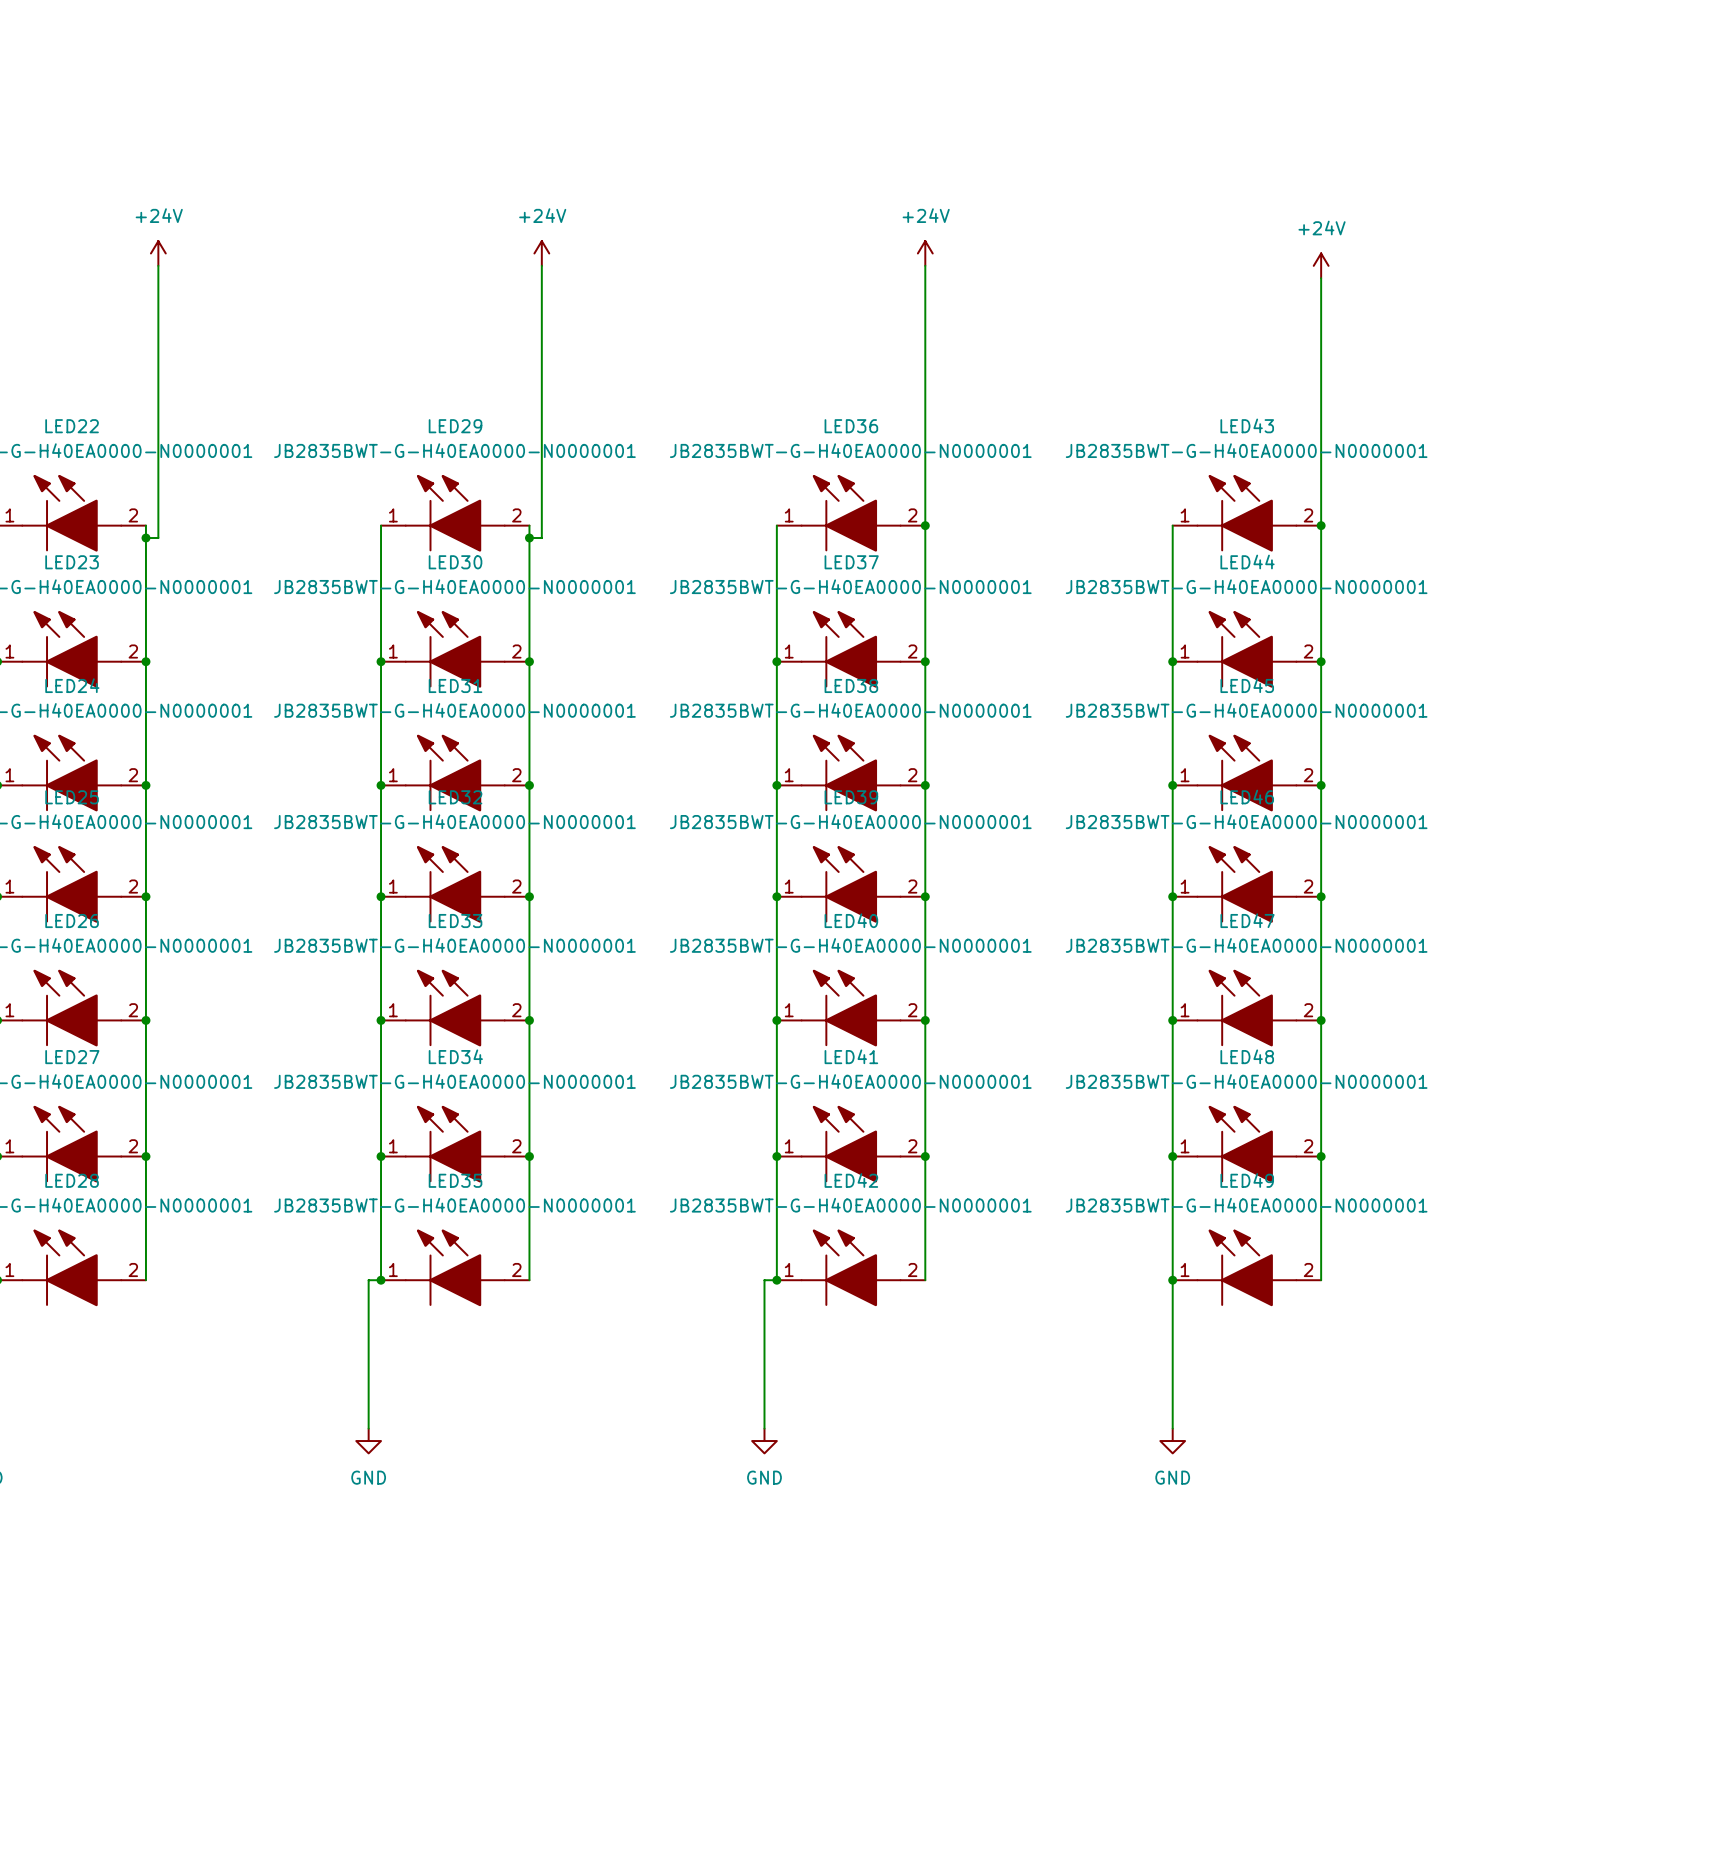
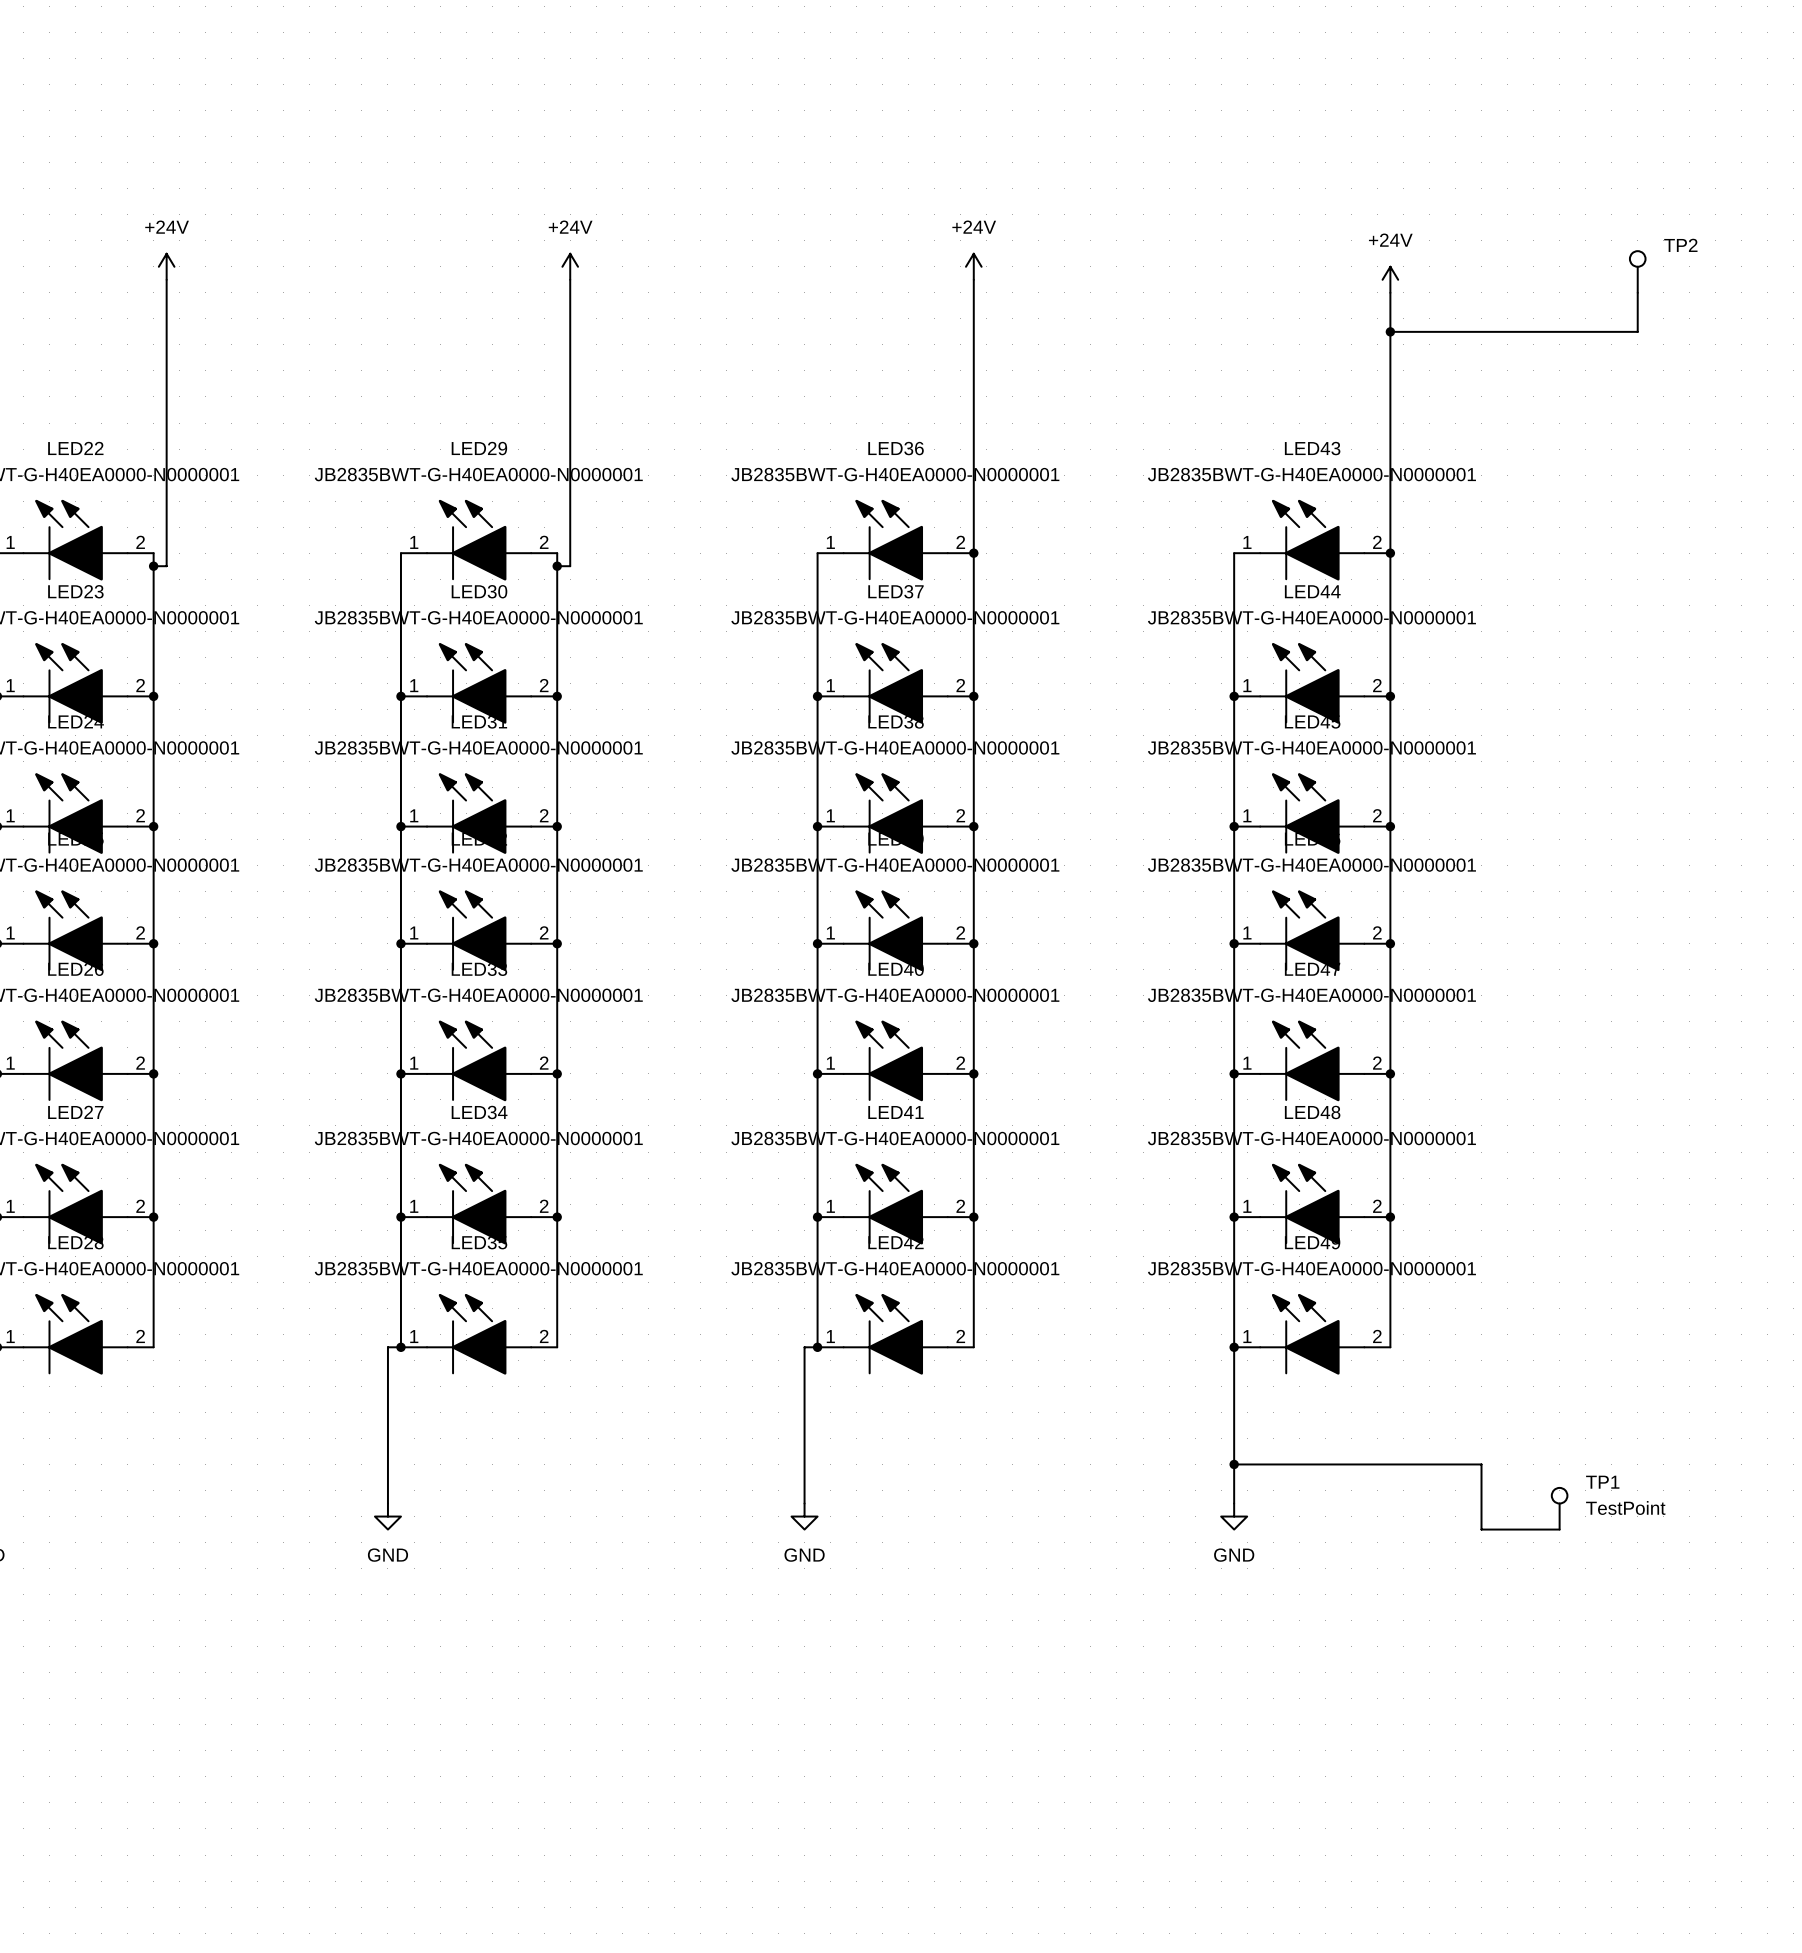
TP2: none -> (1637, 271)
wire: none -> (1637, 292) (1637, 331) (1390, 331)
junction: none -> (1390, 331)
wire: none -> (1234, 1464) (1481, 1464) (1481, 1529) (1559, 1529)
junction: none -> (1234, 1464)
TP1: none -> TestPoint (1559, 1508)

